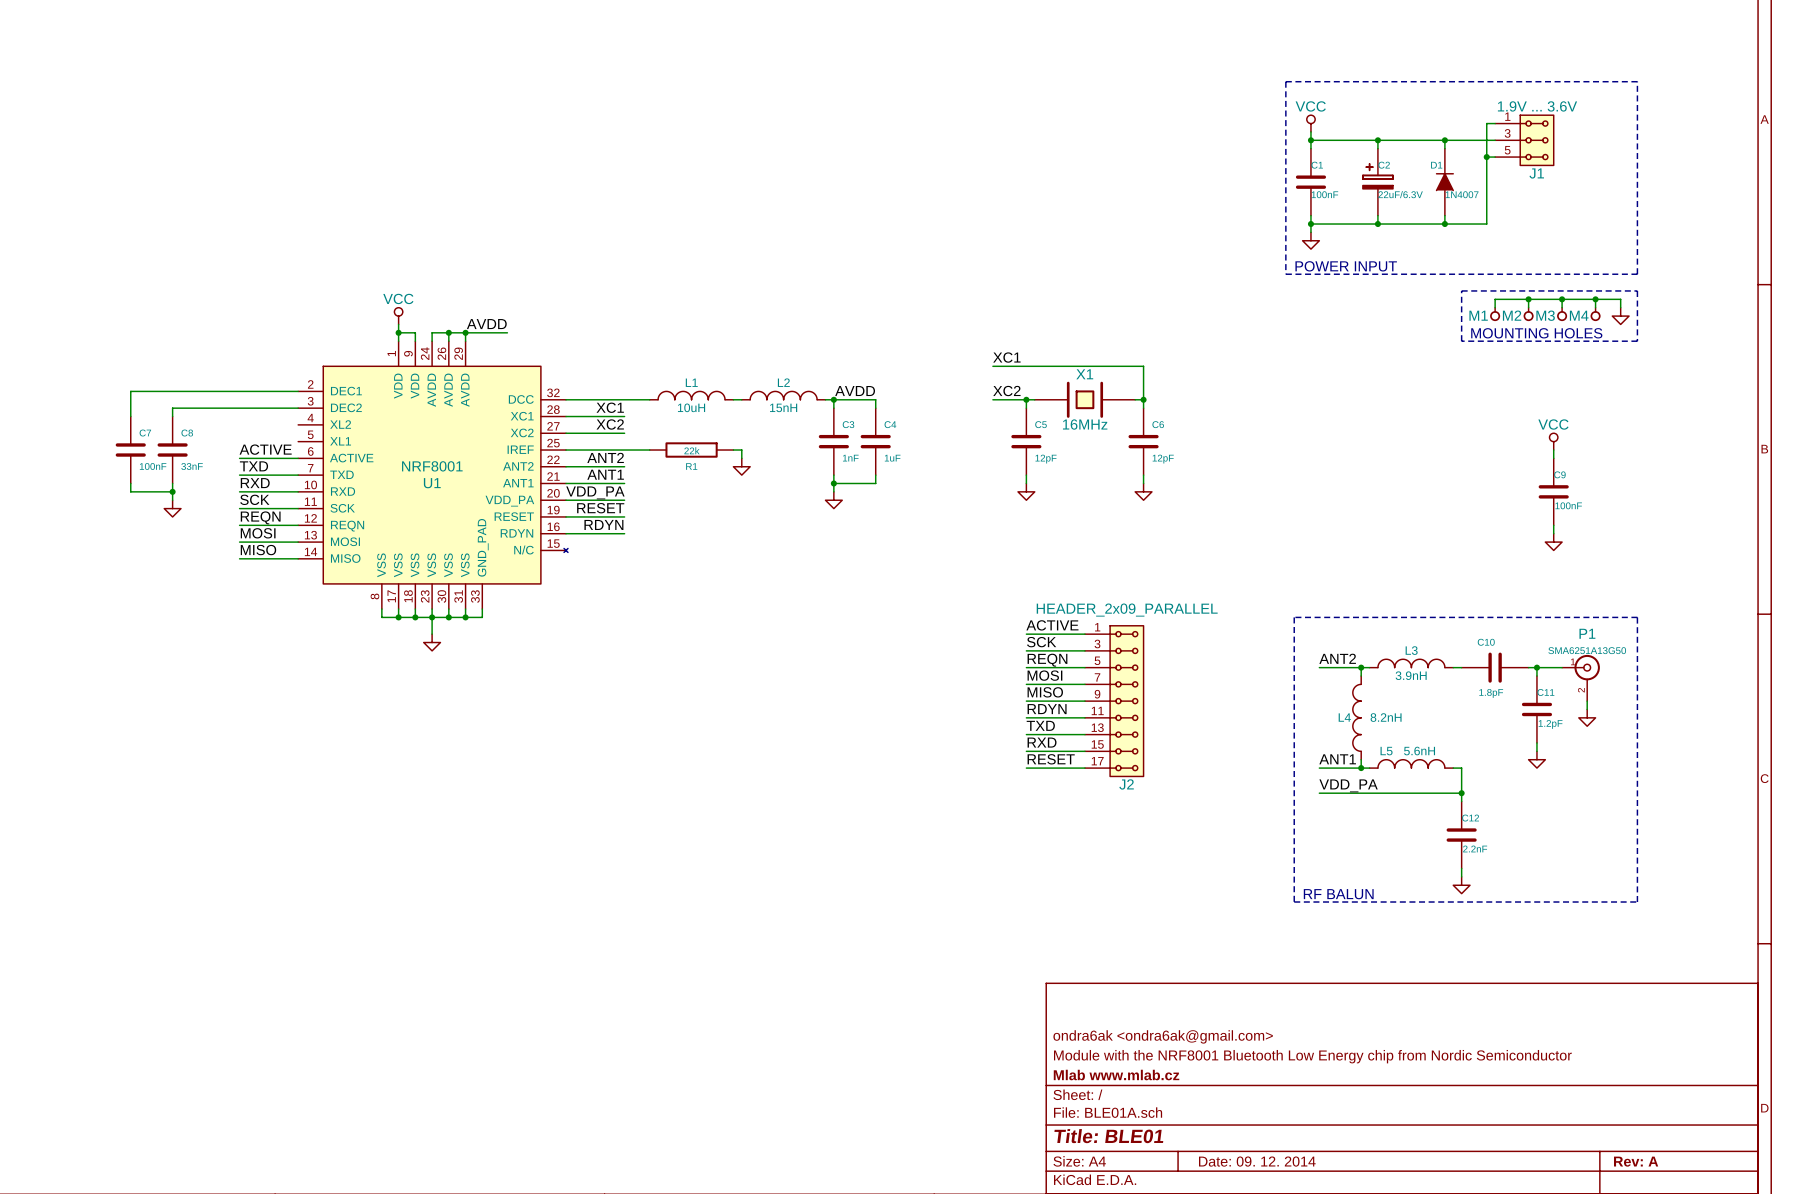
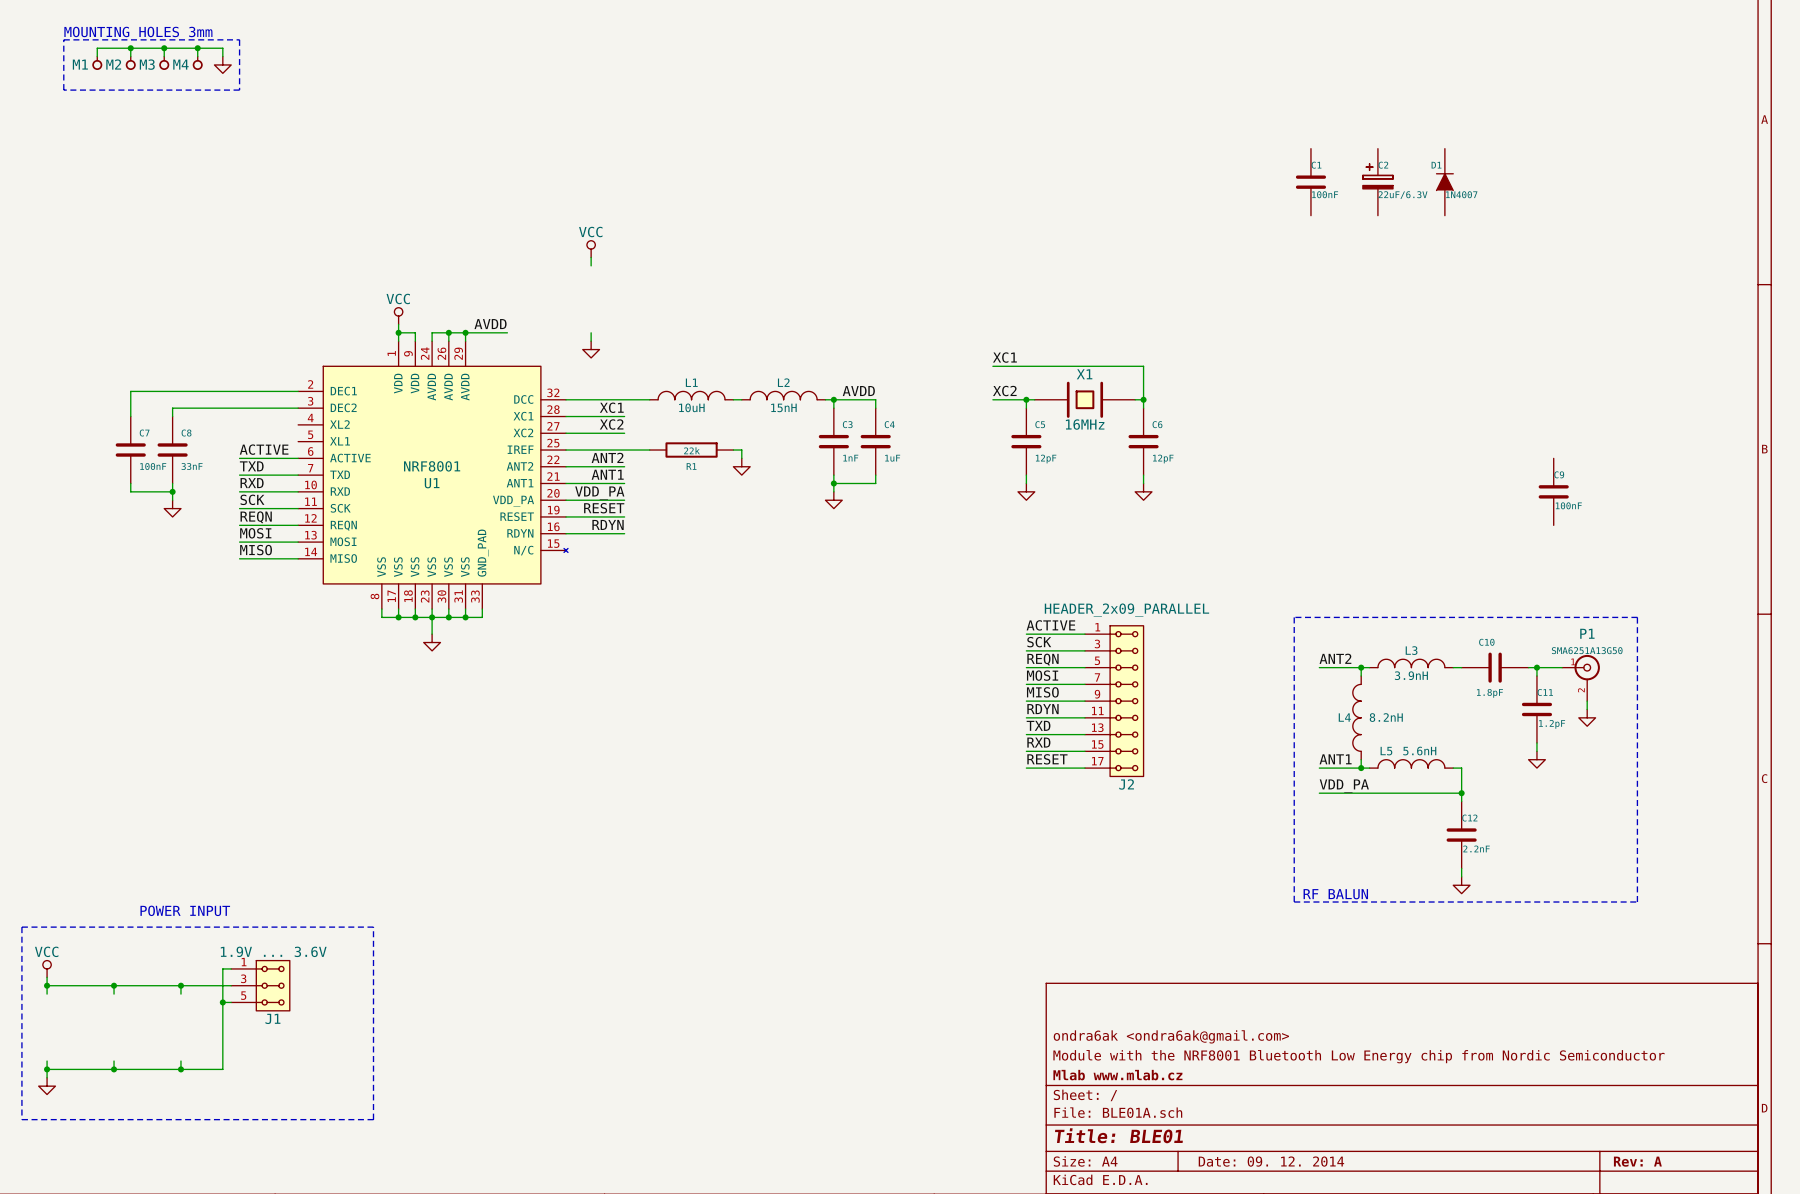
text: none -> MOUNTING HOLES 3mm (138, 31)
line: none -> (63, 39) (63, 90) (239, 90) (239, 39) (63, 39)
wire: none -> (130, 48) (130, 56)
junction: none -> (130, 48)
wire: none -> (164, 48) (164, 56)
junction: none -> (164, 48)
wire: none -> (197, 48) (197, 56)
junction: none -> (197, 48)
wire: none -> (97, 56) (97, 48) (222, 48) (222, 56)
power symbol: none -> (222, 64)
line: (1285, 81) (1637, 81) (1637, 274) (1285, 274) (1285, 81) -> none
power symbol: VCC (1310, 123) -> none
wire: (1495, 123) (1486, 123) (1486, 224) (1310, 224) -> none
wire: (1310, 131) (1310, 148) -> none
wire: (1310, 140) (1495, 140) -> none
junction: (1310, 140) -> none
wire: (1377, 140) (1377, 148) -> none
junction: (1377, 140) -> none
wire: (1444, 140) (1444, 148) -> none
junction: (1444, 140) -> none
J1 position: (1524, 140) -> (260, 985)
wire: (1486, 157) (1495, 157) -> none
junction: (1486, 157) -> none
wire: (1310, 215) (1310, 232) -> none
wire: (1377, 215) (1377, 224) -> none
wire: (1444, 215) (1444, 224) -> none
junction: (1310, 224) -> none
junction: (1377, 224) -> none
junction: (1444, 224) -> none
power symbol: (1310, 240) -> none
power symbol: none -> VCC (591, 249)
wire: none -> (591, 257) (591, 265)
text: POWER INPUT (1346, 266) -> none
line: (1461, 290) (1461, 341) (1637, 341) (1637, 290) (1461, 290) -> none
wire: (1528, 299) (1528, 307) -> none
junction: (1528, 299) -> none
wire: (1562, 299) (1562, 307) -> none
junction: (1562, 299) -> none
wire: (1595, 299) (1595, 307) -> none
junction: (1595, 299) -> none
wire: (1495, 307) (1495, 299) (1620, 299) (1620, 307) -> none
M1 position: (1495, 314) -> (97, 63)
M2 position: (1528, 314) -> (130, 63)
M3 position: (1562, 314) -> (164, 63)
M4 position: (1595, 314) -> (197, 63)
power symbol: (1620, 316) -> none
wire: none -> (591, 332) (591, 341)
text: MOUNTING HOLES (1536, 333) -> none
power symbol: none -> (591, 349)
power symbol: VCC (1553, 441) -> none
wire: (1553, 450) (1553, 458) -> none
wire: (1553, 525) (1553, 533) -> none
power symbol: (1553, 542) -> none
text: none -> POWER INPUT (185, 910)
line: none -> (21, 927) (373, 927) (373, 1119) (21, 1119) (21, 927)
power symbol: none -> VCC (47, 968)
wire: none -> (231, 968) (222, 968) (222, 1069) (47, 1069)
wire: none -> (47, 977) (47, 994)
wire: none -> (47, 985) (231, 985)
junction: none -> (47, 985)
wire: none -> (114, 985) (114, 994)
junction: none -> (114, 985)
wire: none -> (180, 985) (180, 994)
junction: none -> (180, 985)
wire: none -> (222, 1002) (231, 1002)
junction: none -> (222, 1002)
wire: none -> (47, 1061) (47, 1077)
wire: none -> (114, 1061) (114, 1069)
wire: none -> (180, 1061) (180, 1069)
junction: none -> (47, 1069)
junction: none -> (114, 1069)
junction: none -> (180, 1069)
power symbol: none -> (47, 1086)

